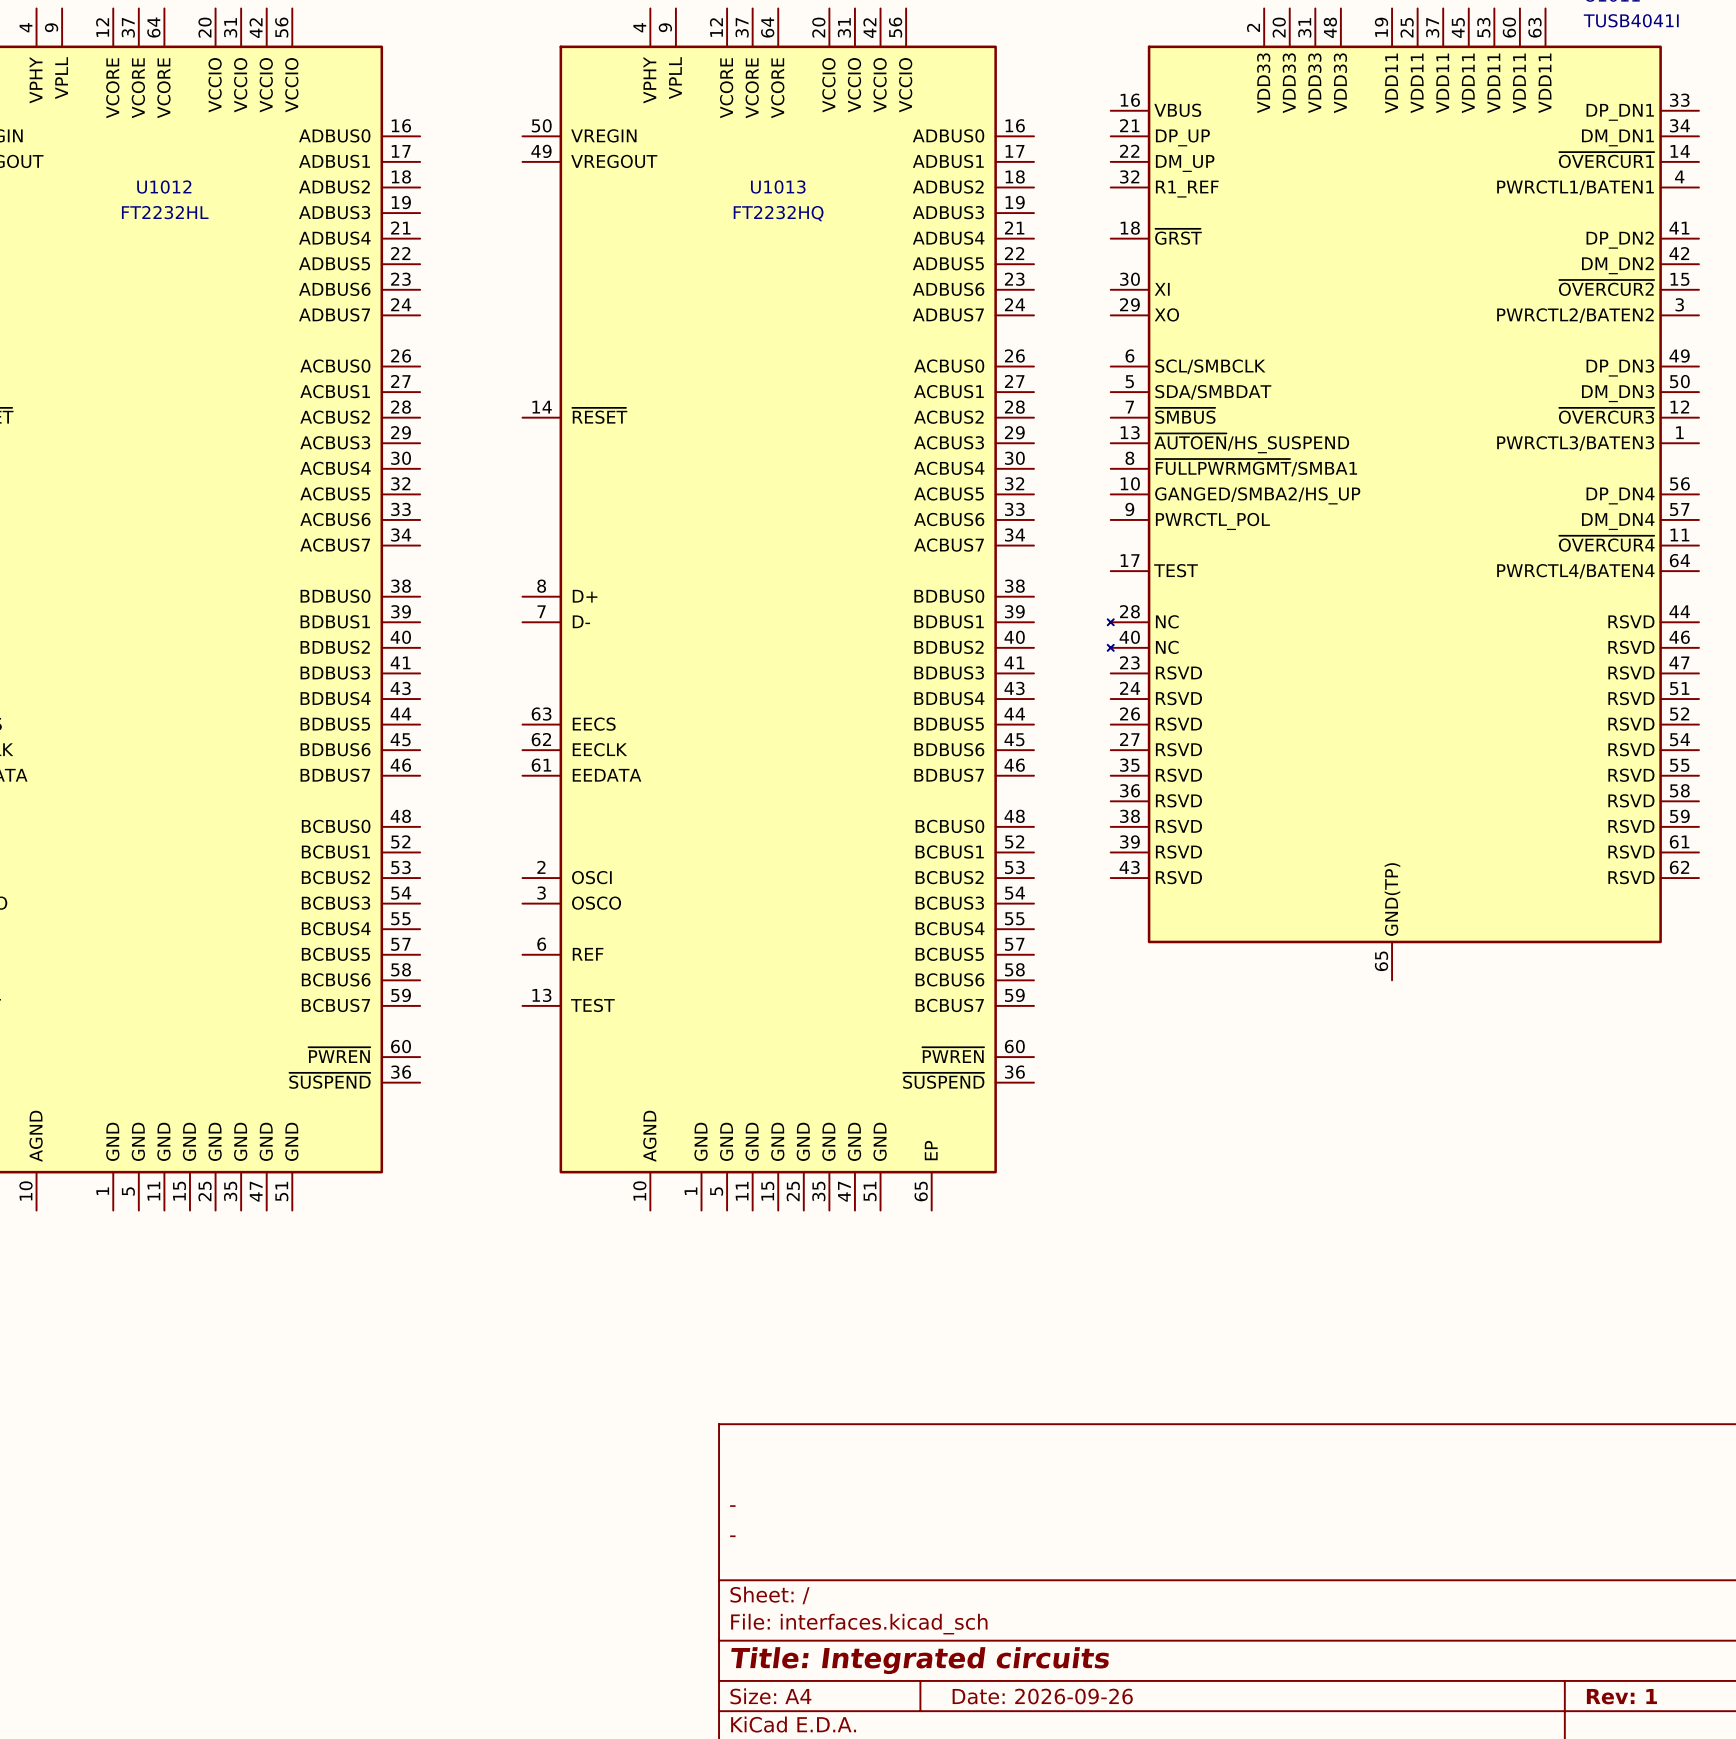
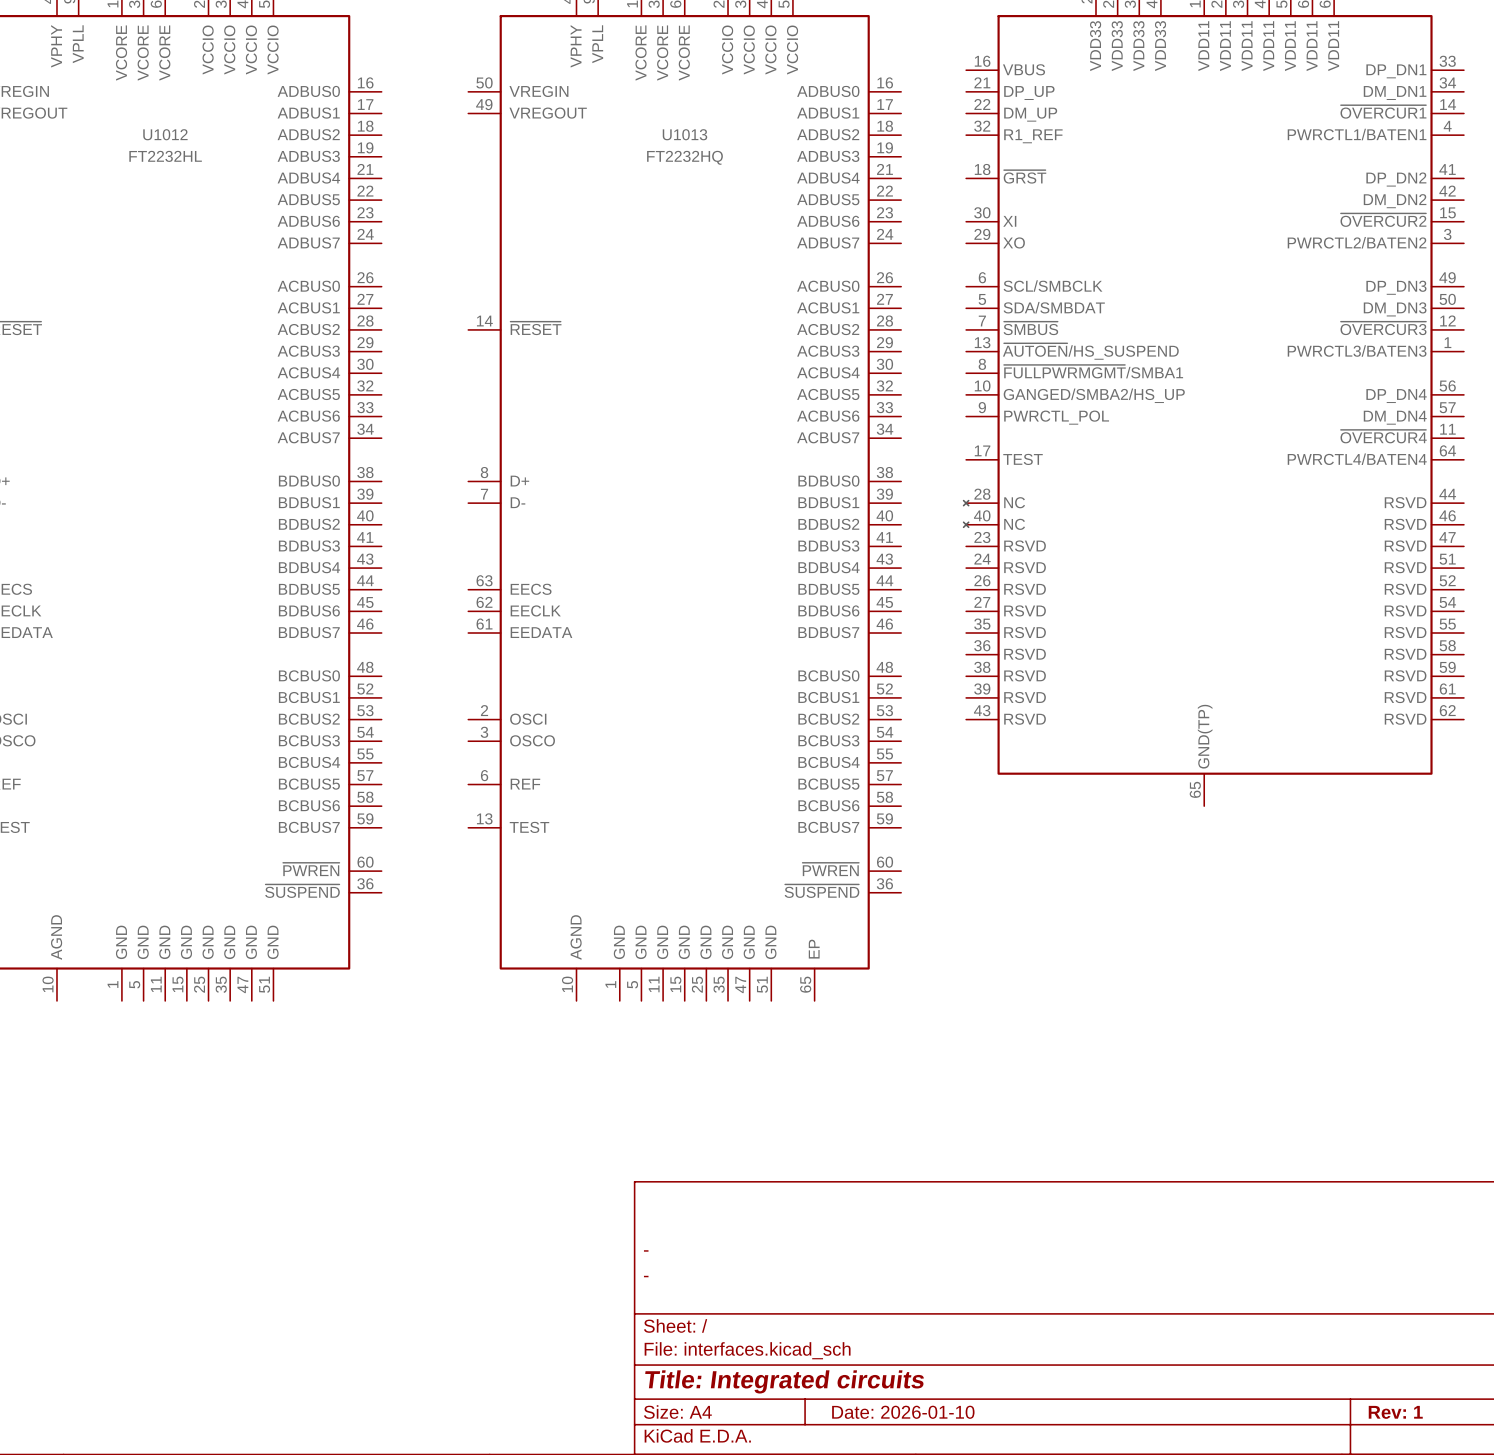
title block: Date: 2026-09-26 (1042, 1696) -> Date: 2026-01-10 (903, 1412)

